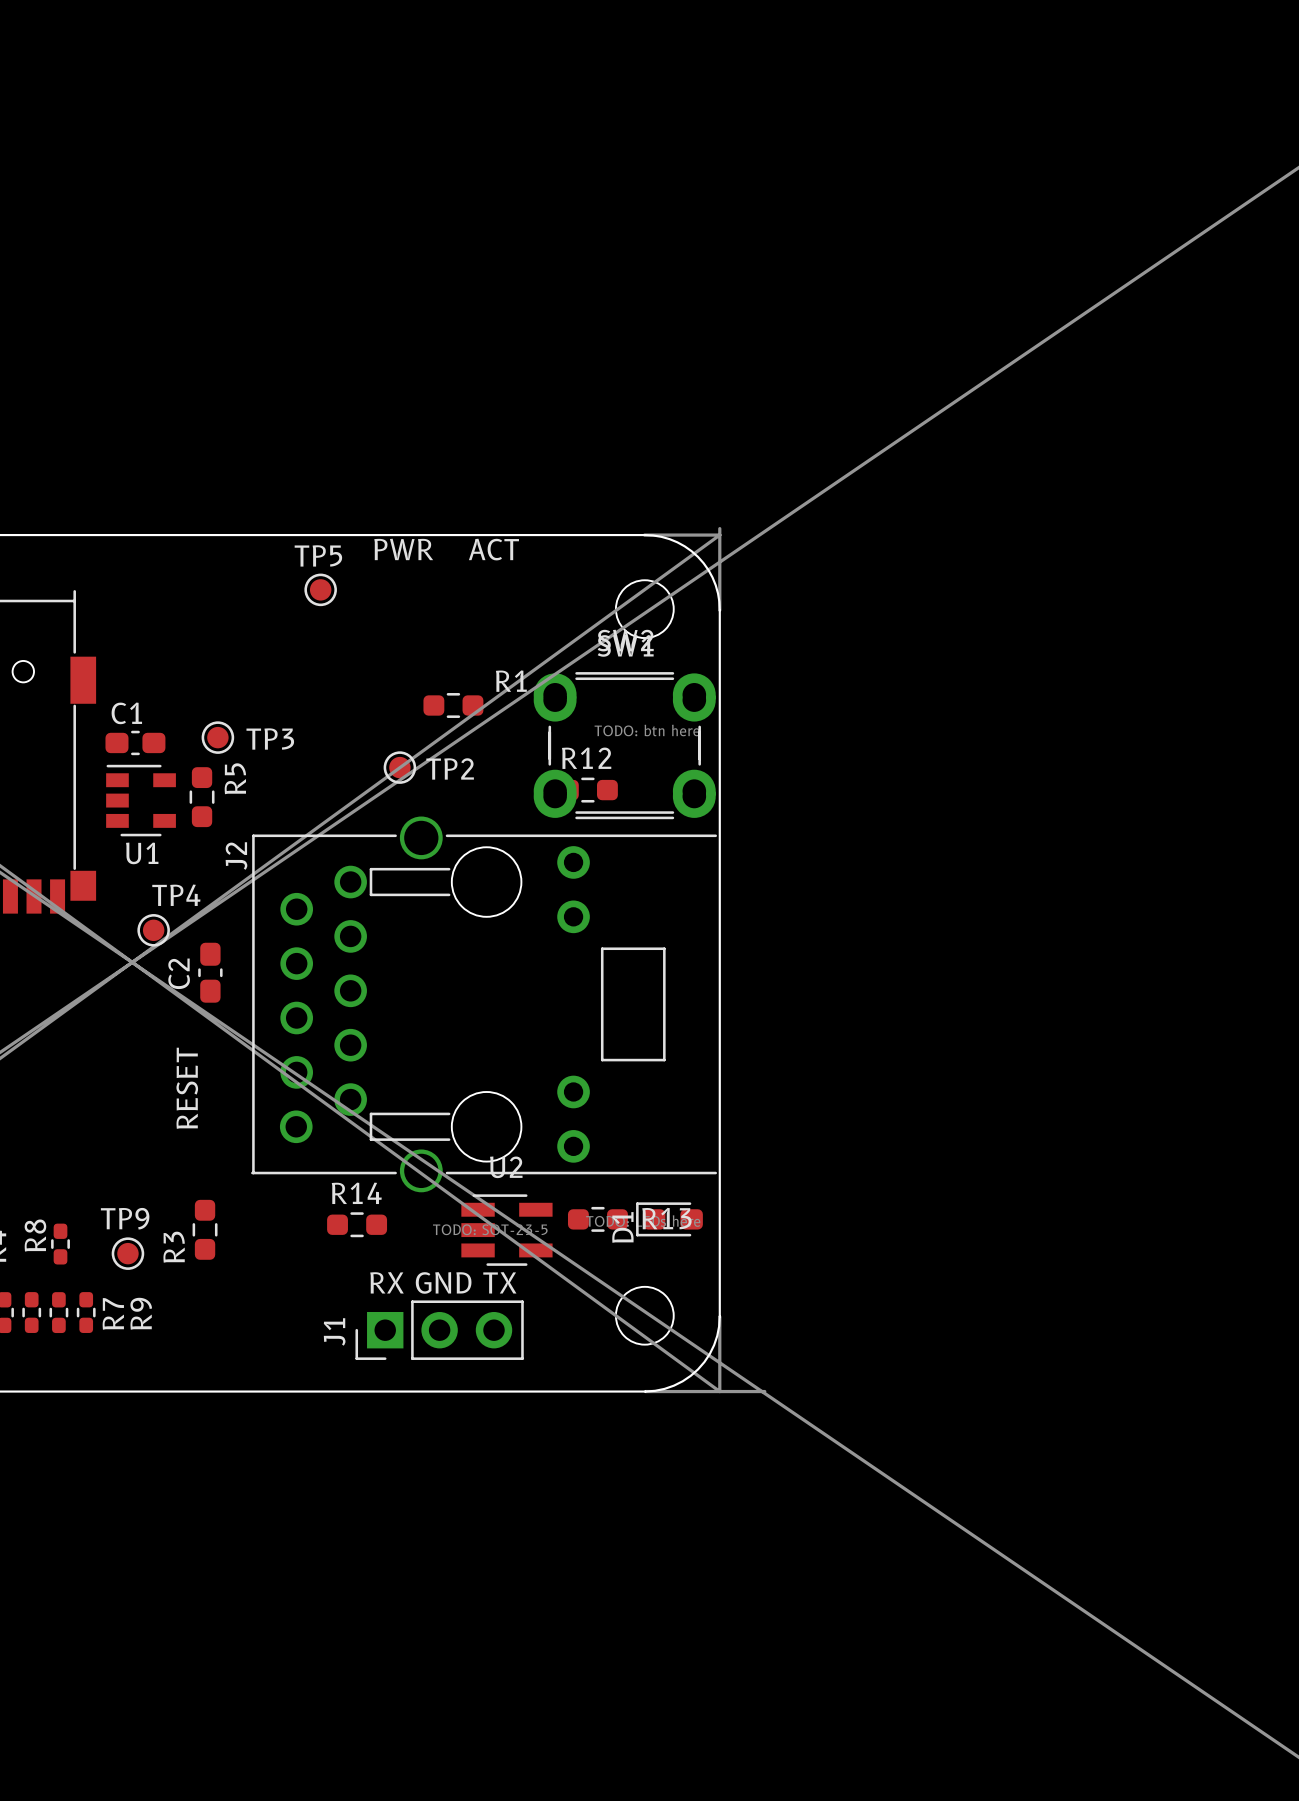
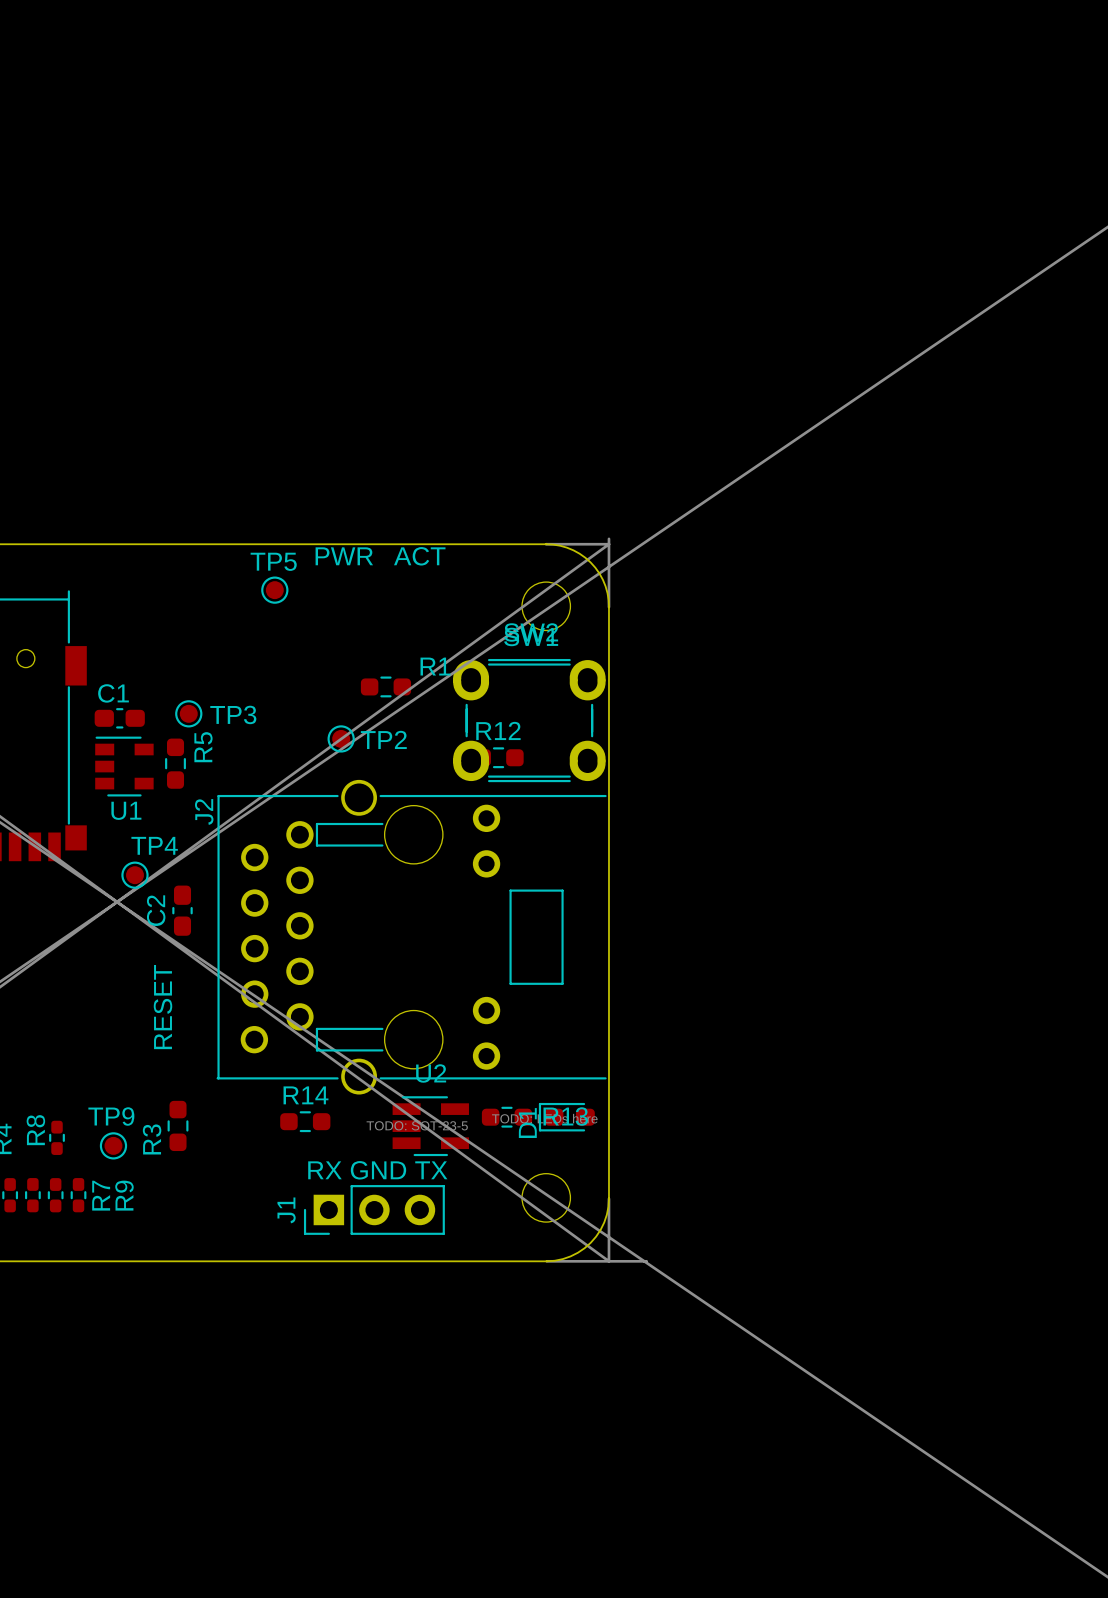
text: TODO: btn here (647, 730) -> none

